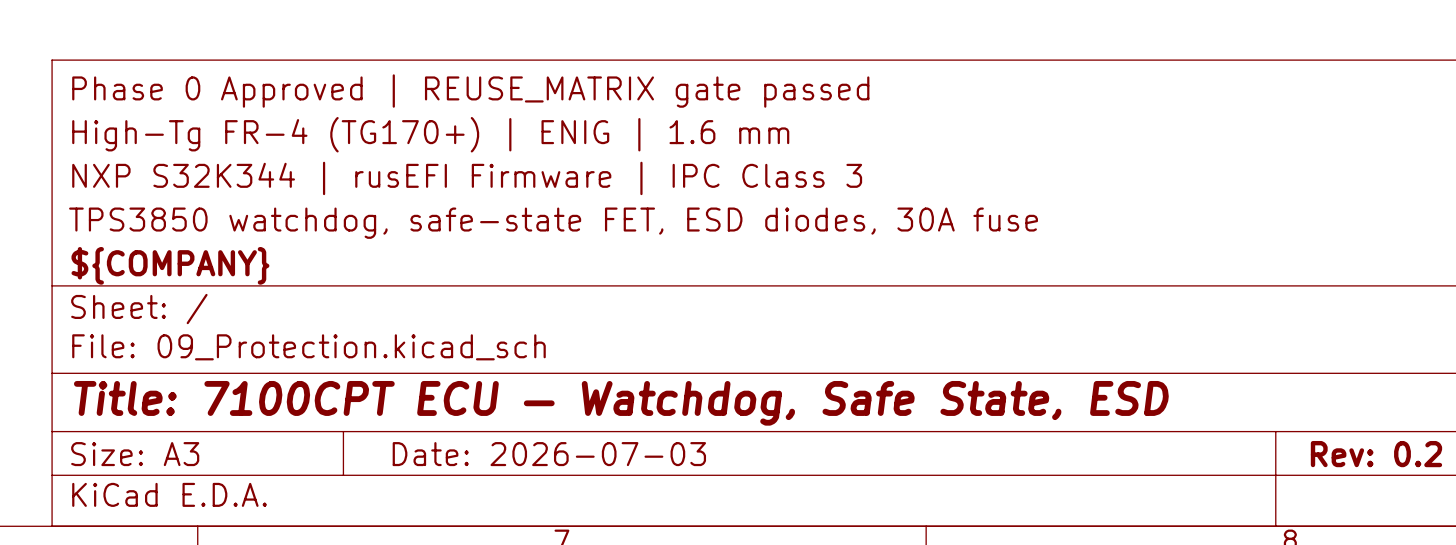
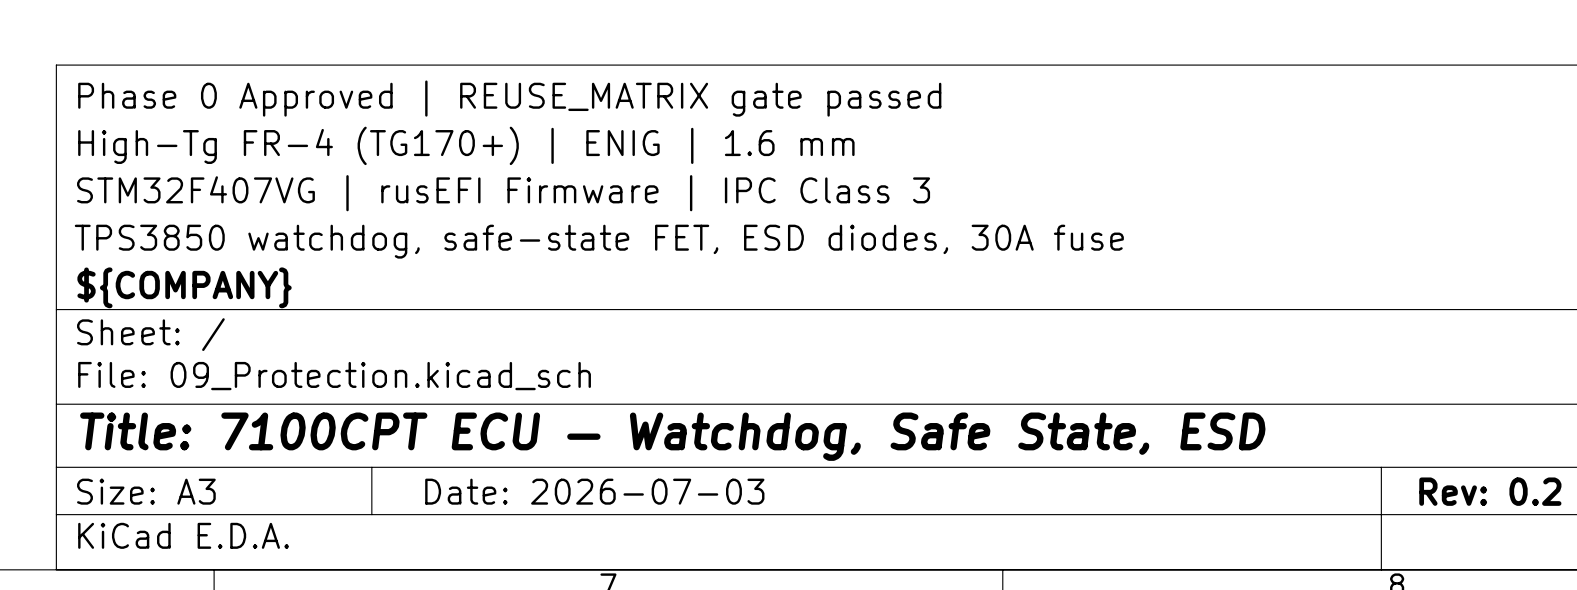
title block: NXP S32K344 | rusEFI Firmware | IPC Class 3 (467, 178) -> STM32F407VG | rusEFI Firmware | IPC Class 3 (503, 193)

